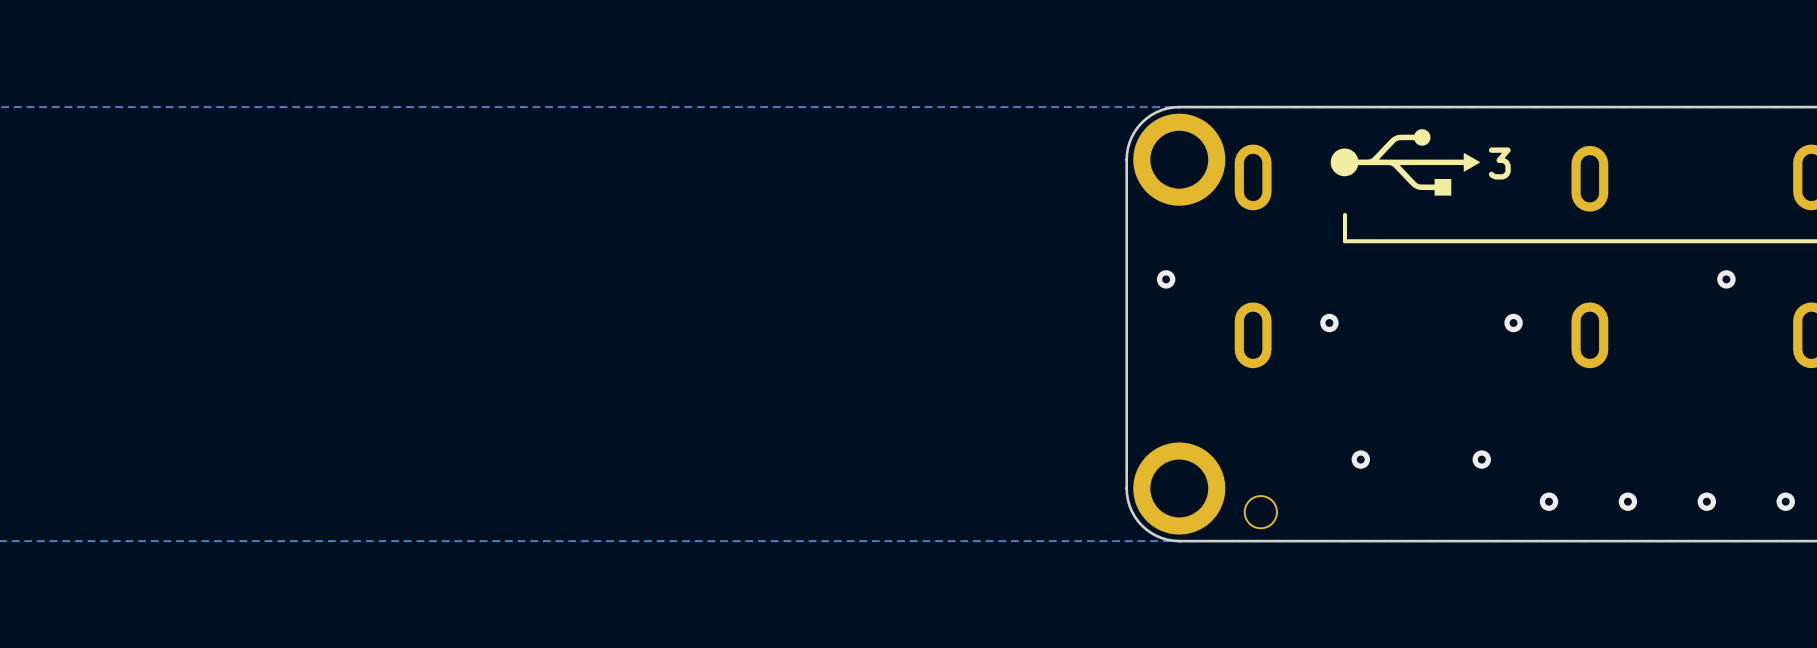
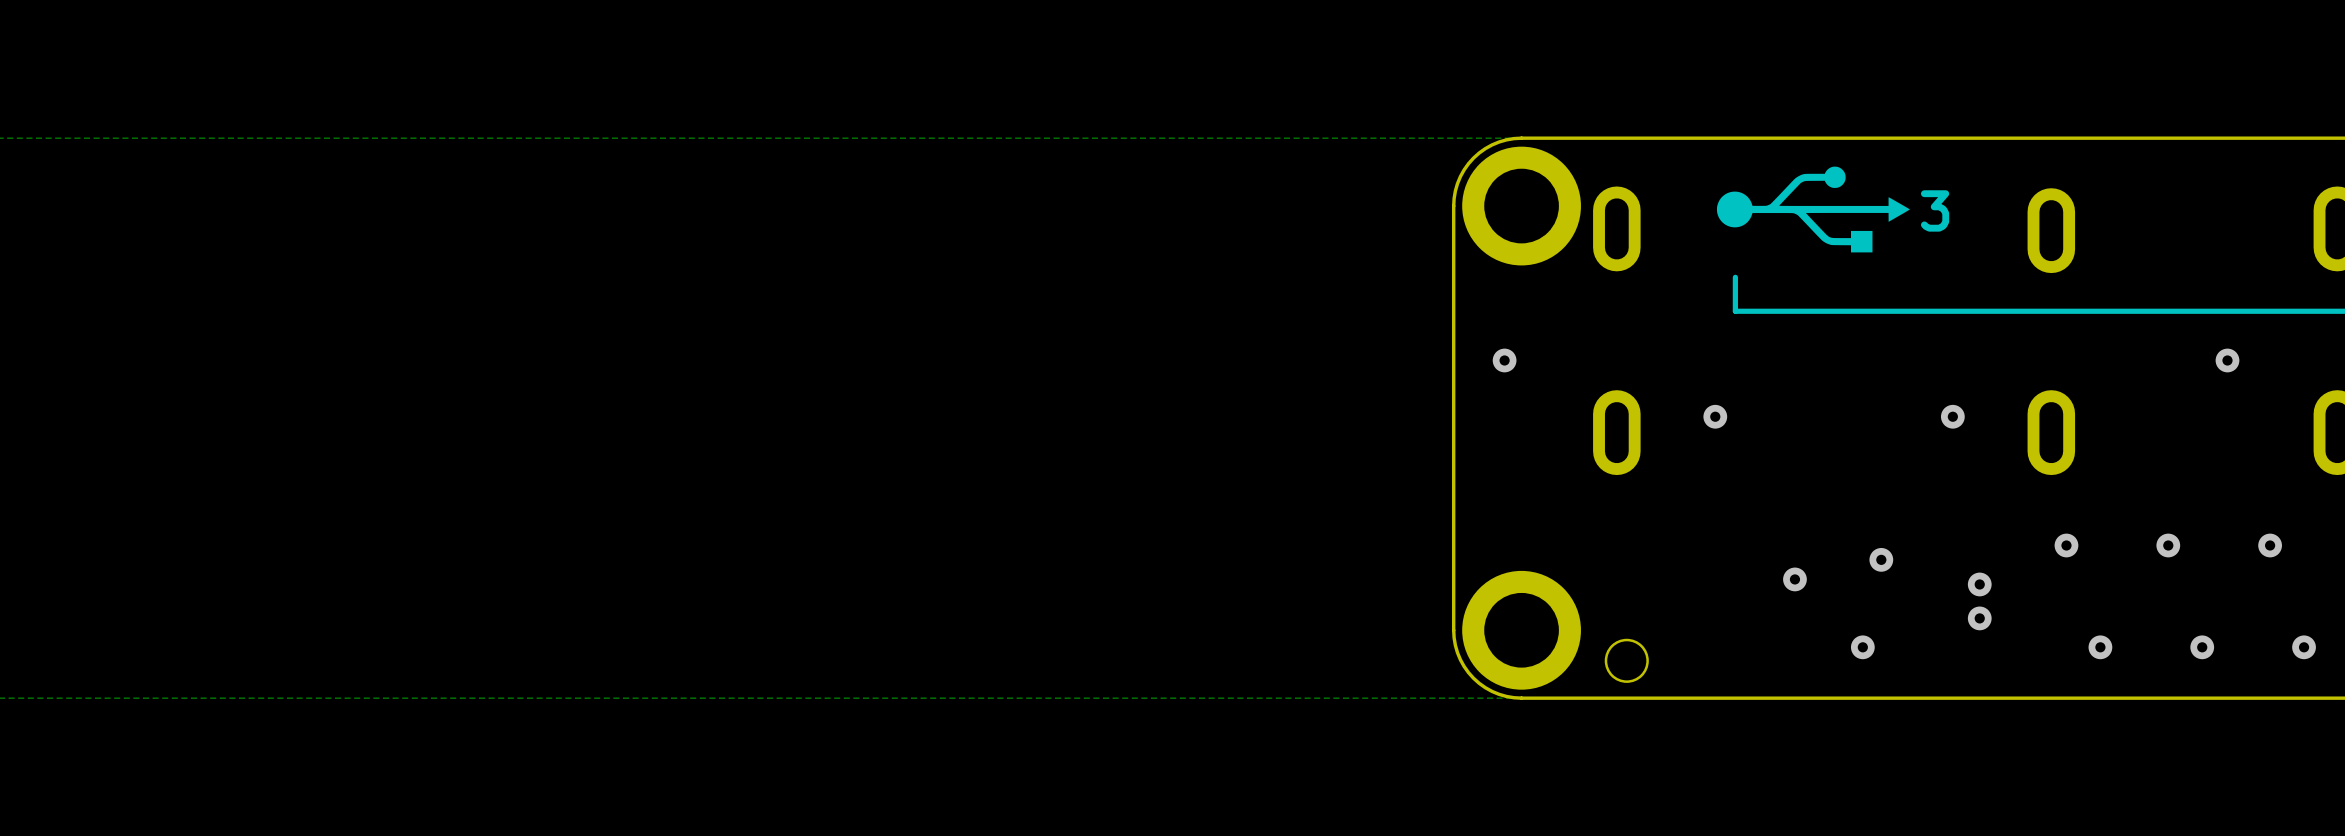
via: none -> (2066, 545)
via: none -> (2168, 545)
via: none -> (2270, 545)
via: none -> (1881, 559)
via: none -> (1979, 584)
via position: (1360, 459) -> (1794, 579)
via: (1481, 459) -> none
via: none -> (1979, 618)
via: none -> (1862, 647)
via: (1549, 501) -> none

